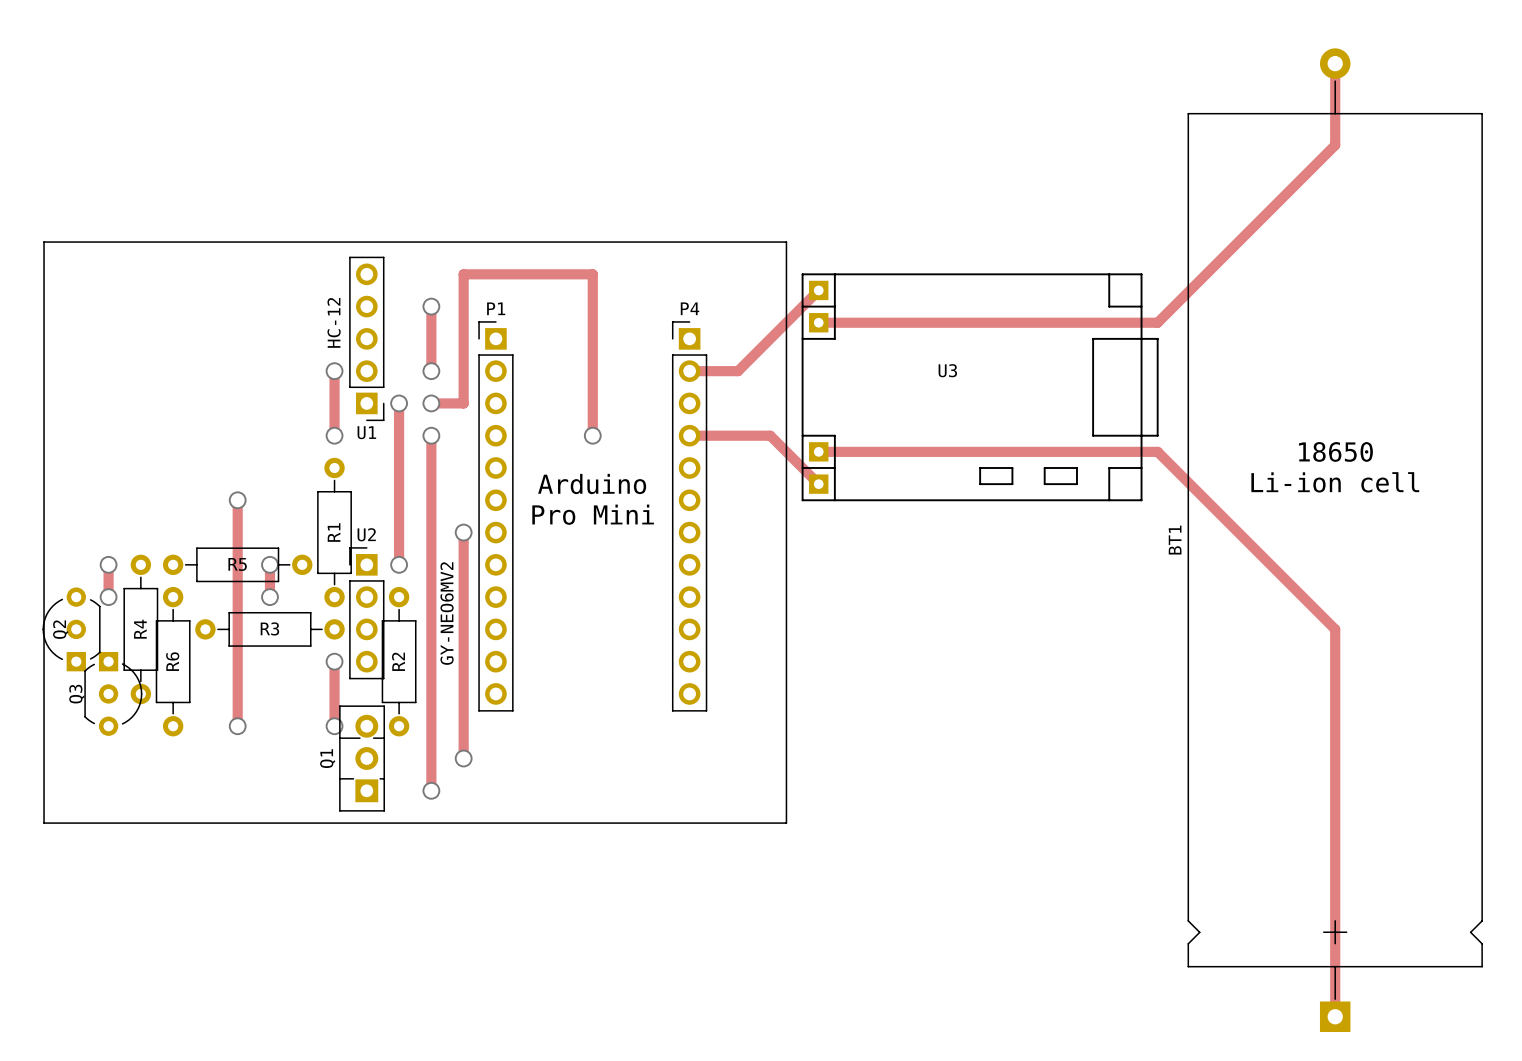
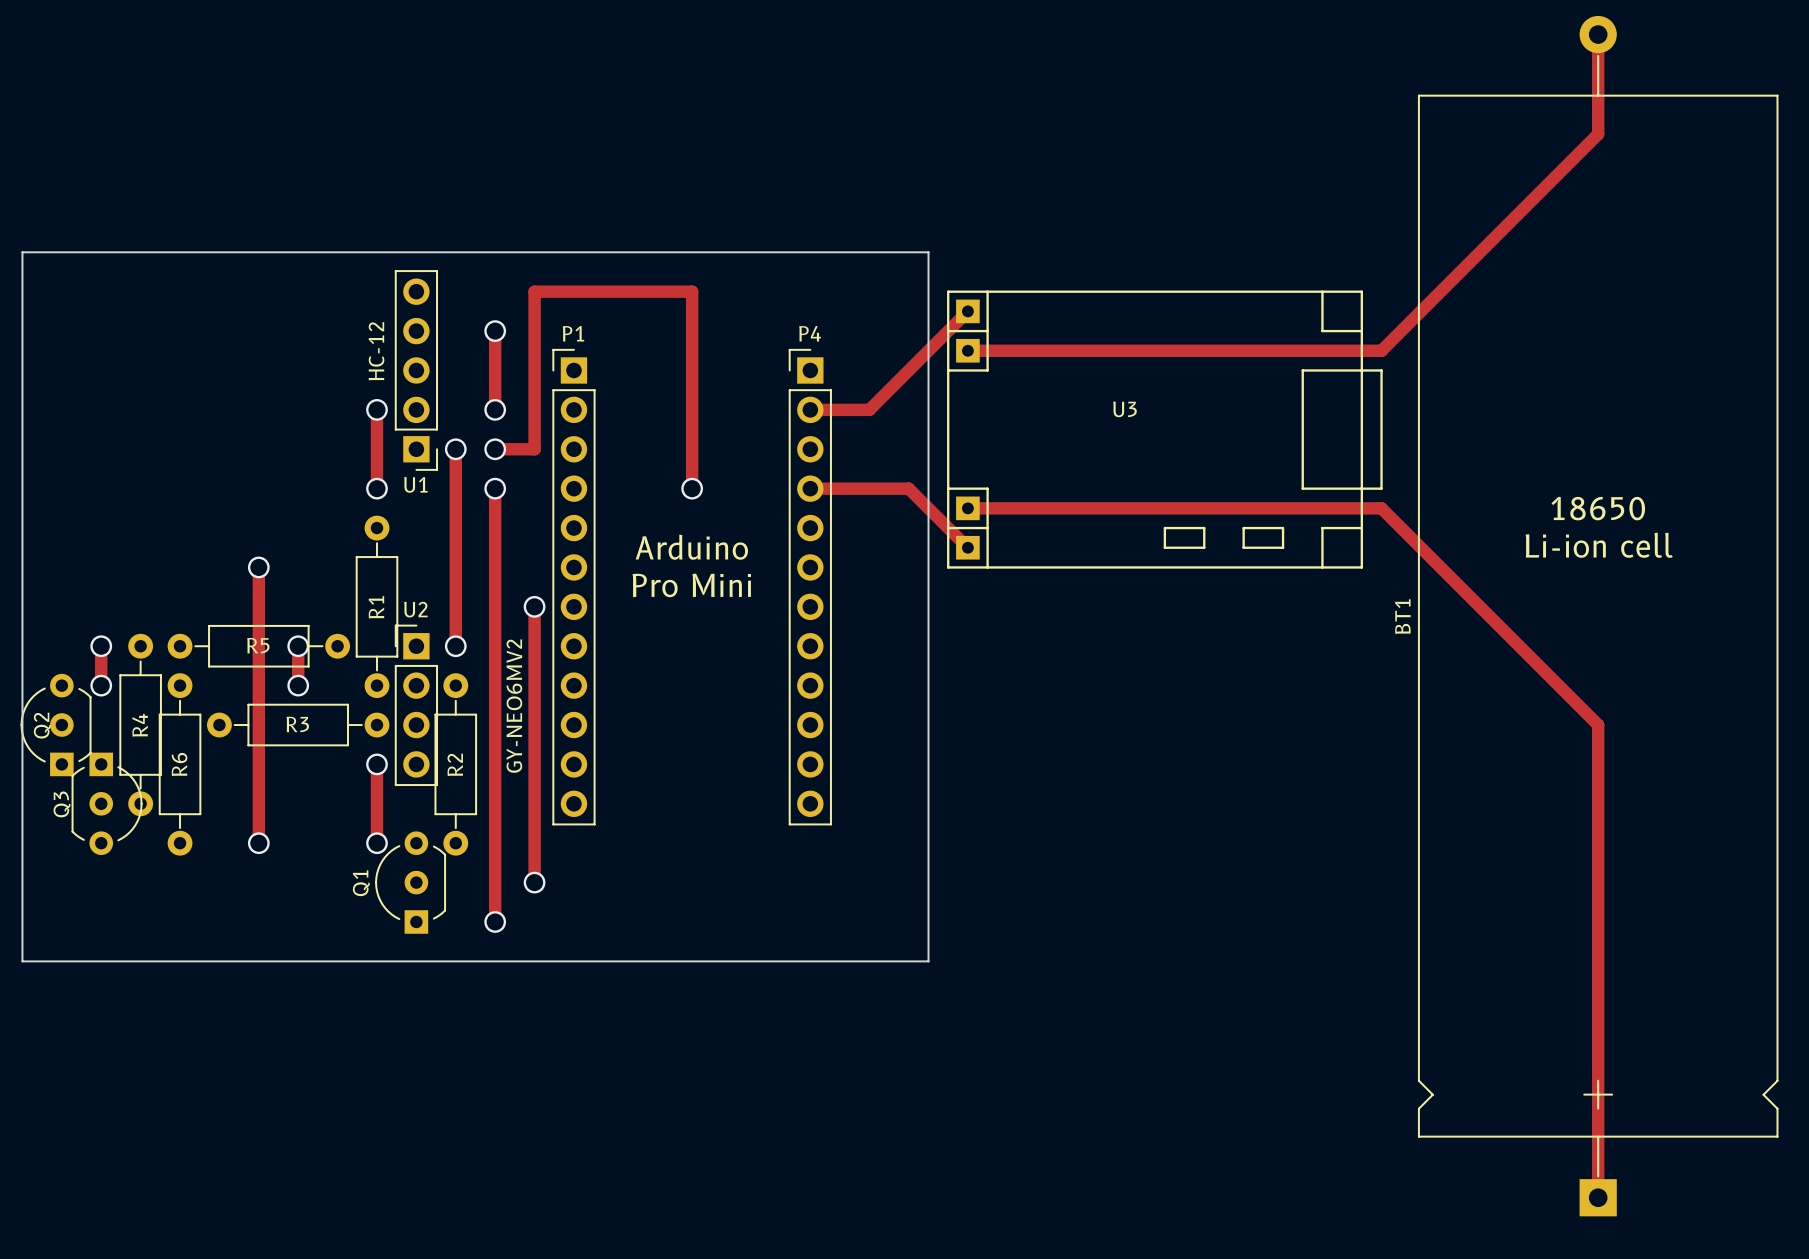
Q1 footprint: [339, 705, 385, 812] -> [375, 831, 447, 934]

